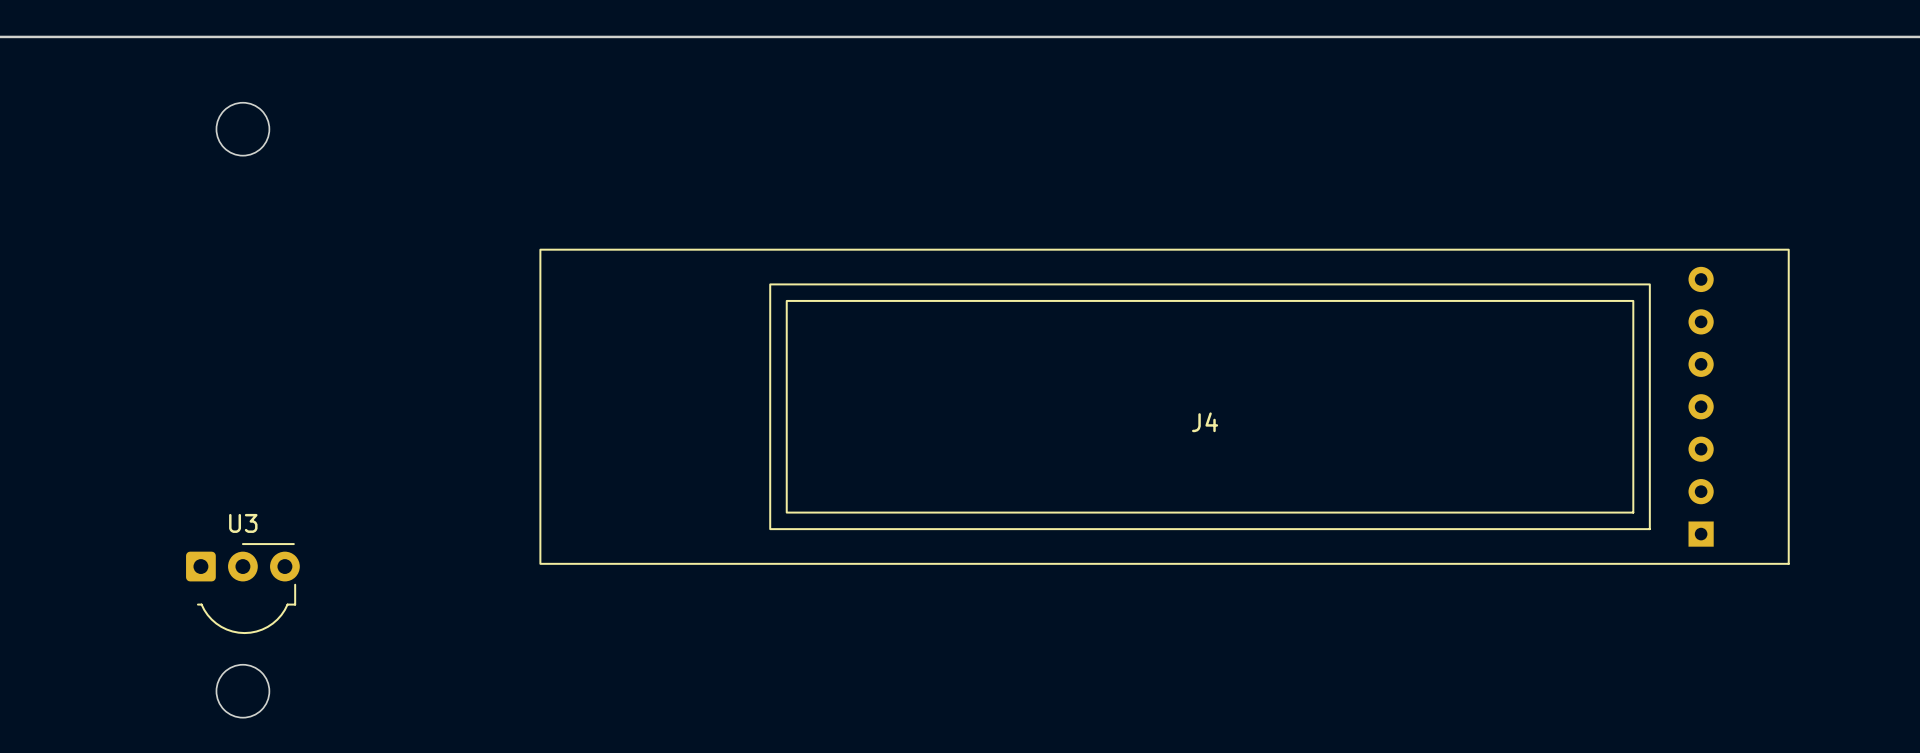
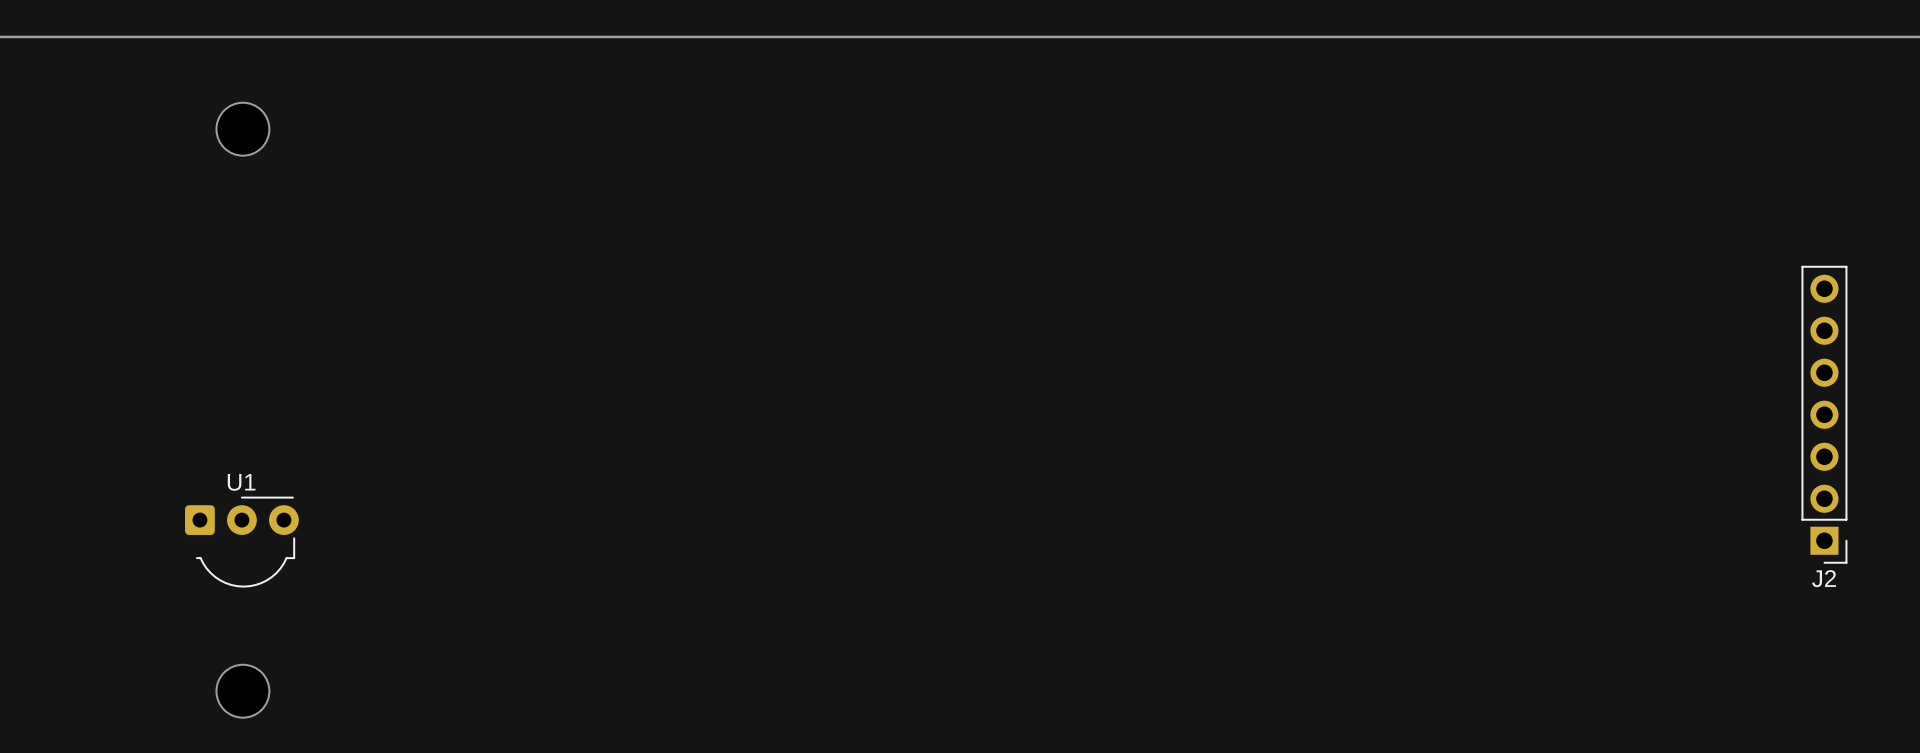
J4: (1164, 406) -> none
J2: none -> (1824, 414)
U1: none -> (241, 542)
U3: (242, 588) -> none

